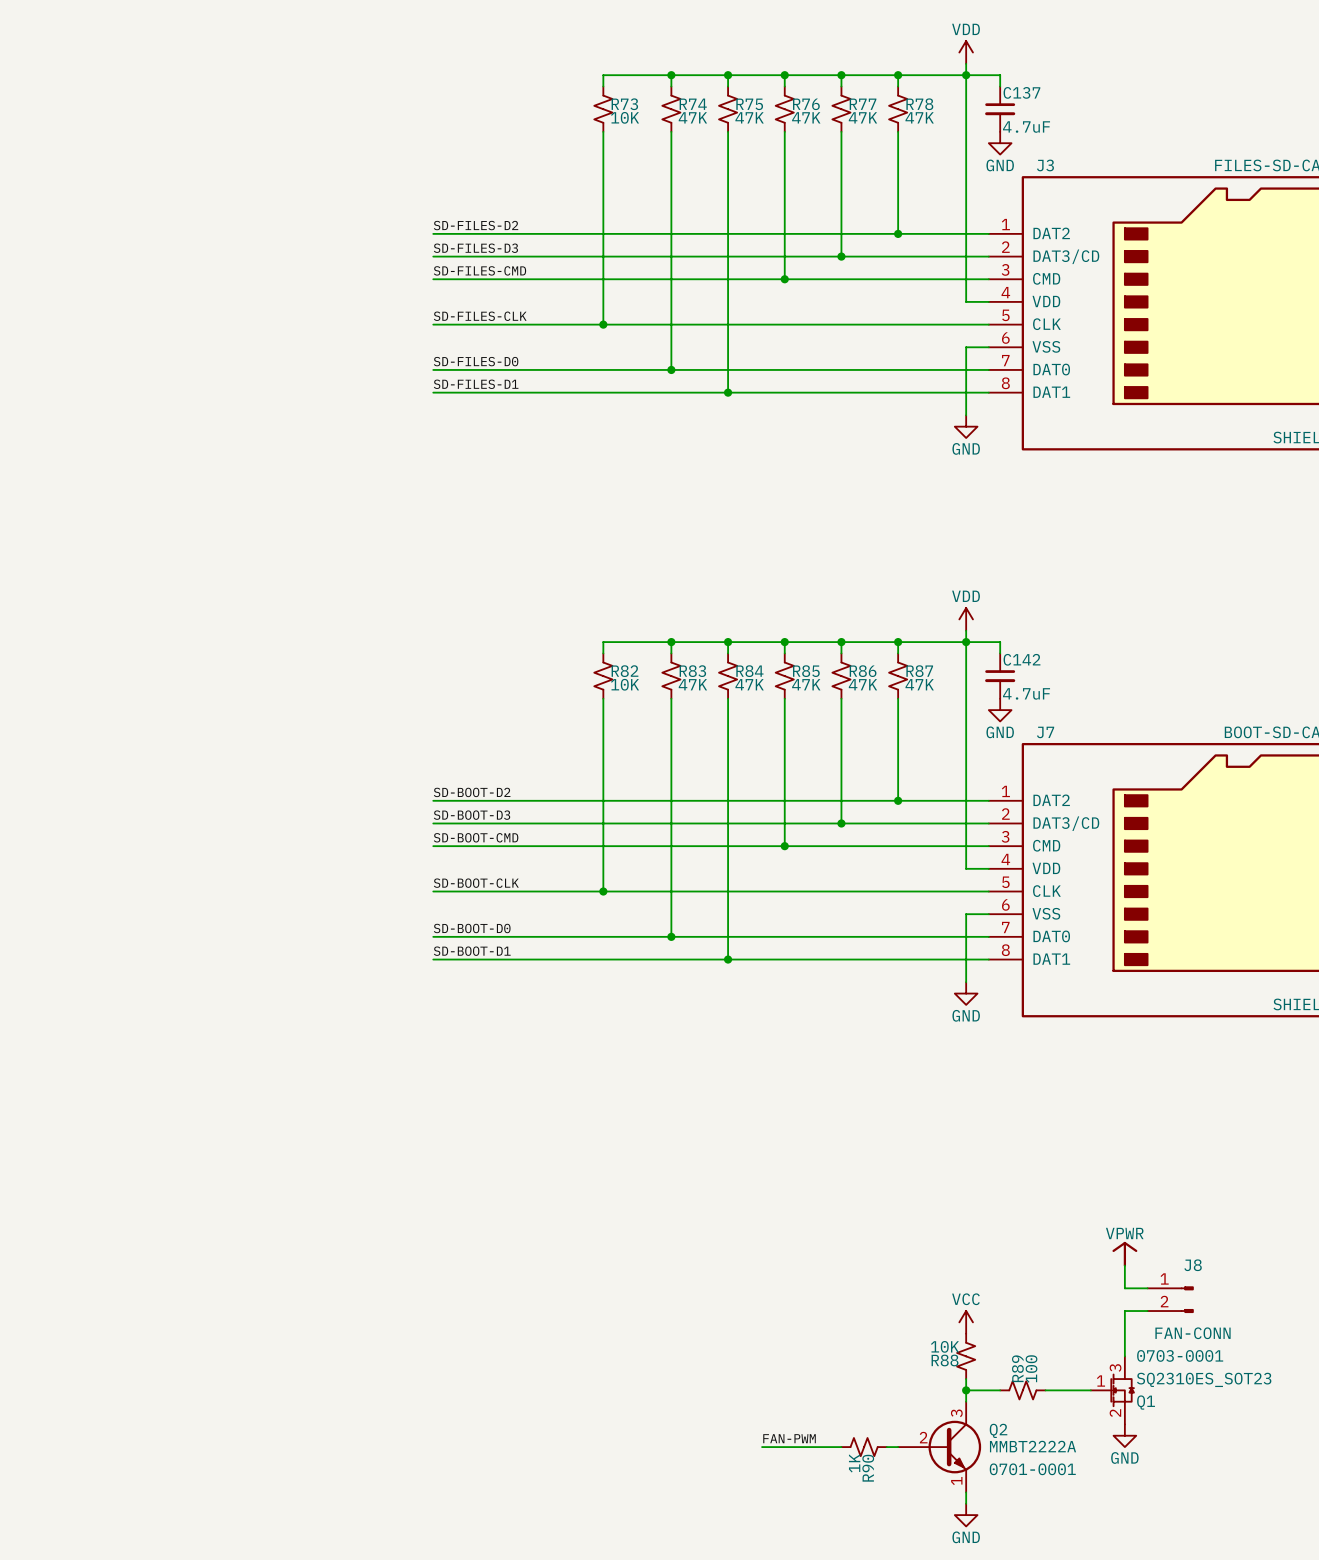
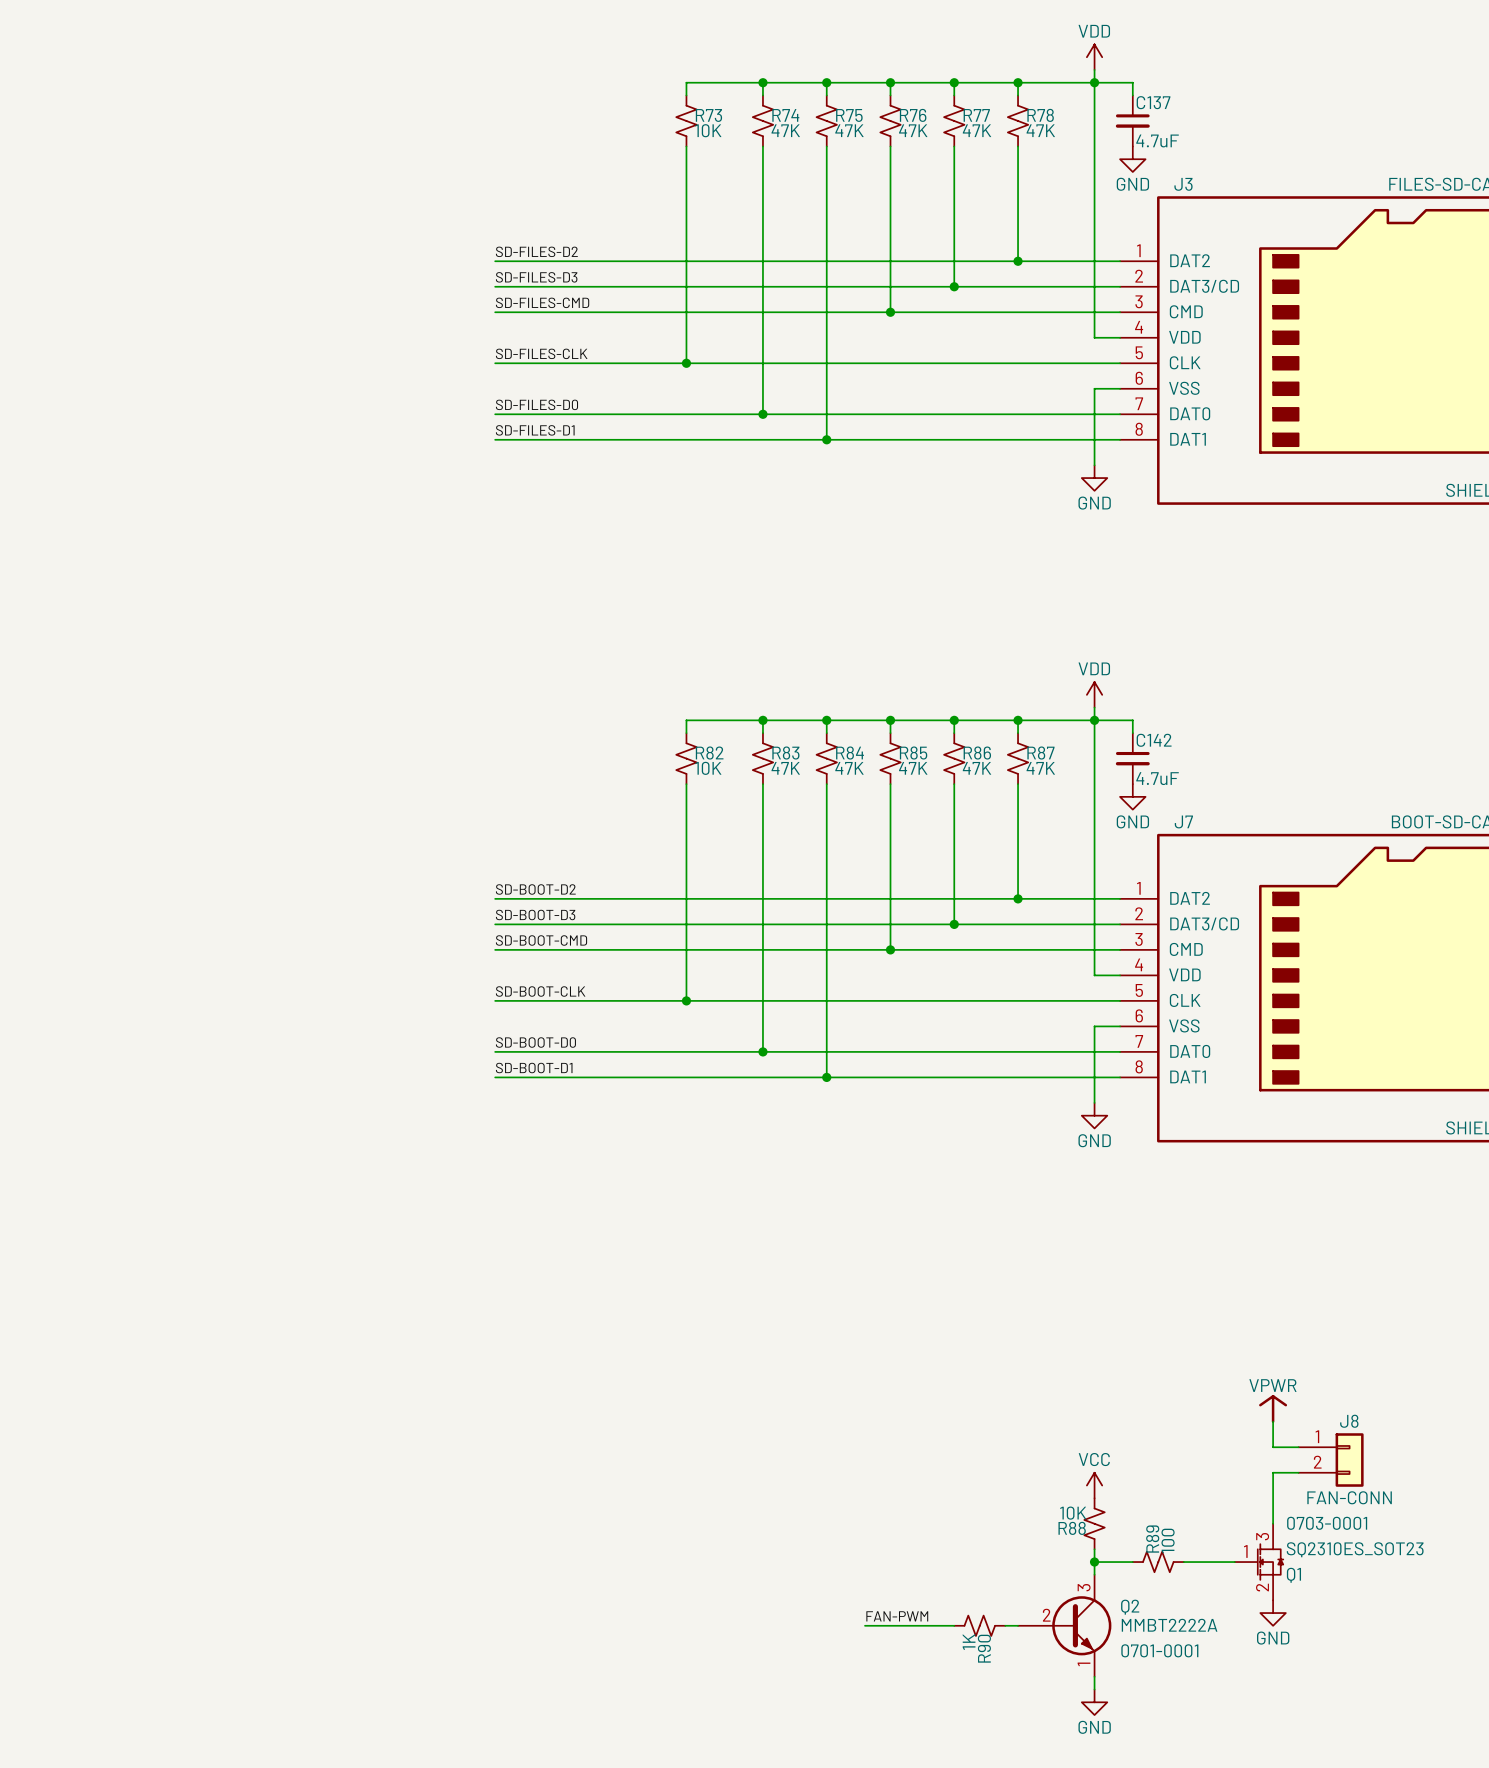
J8 symbol: [1147, 1286, 1194, 1313] -> [1298, 1433, 1364, 1487]

